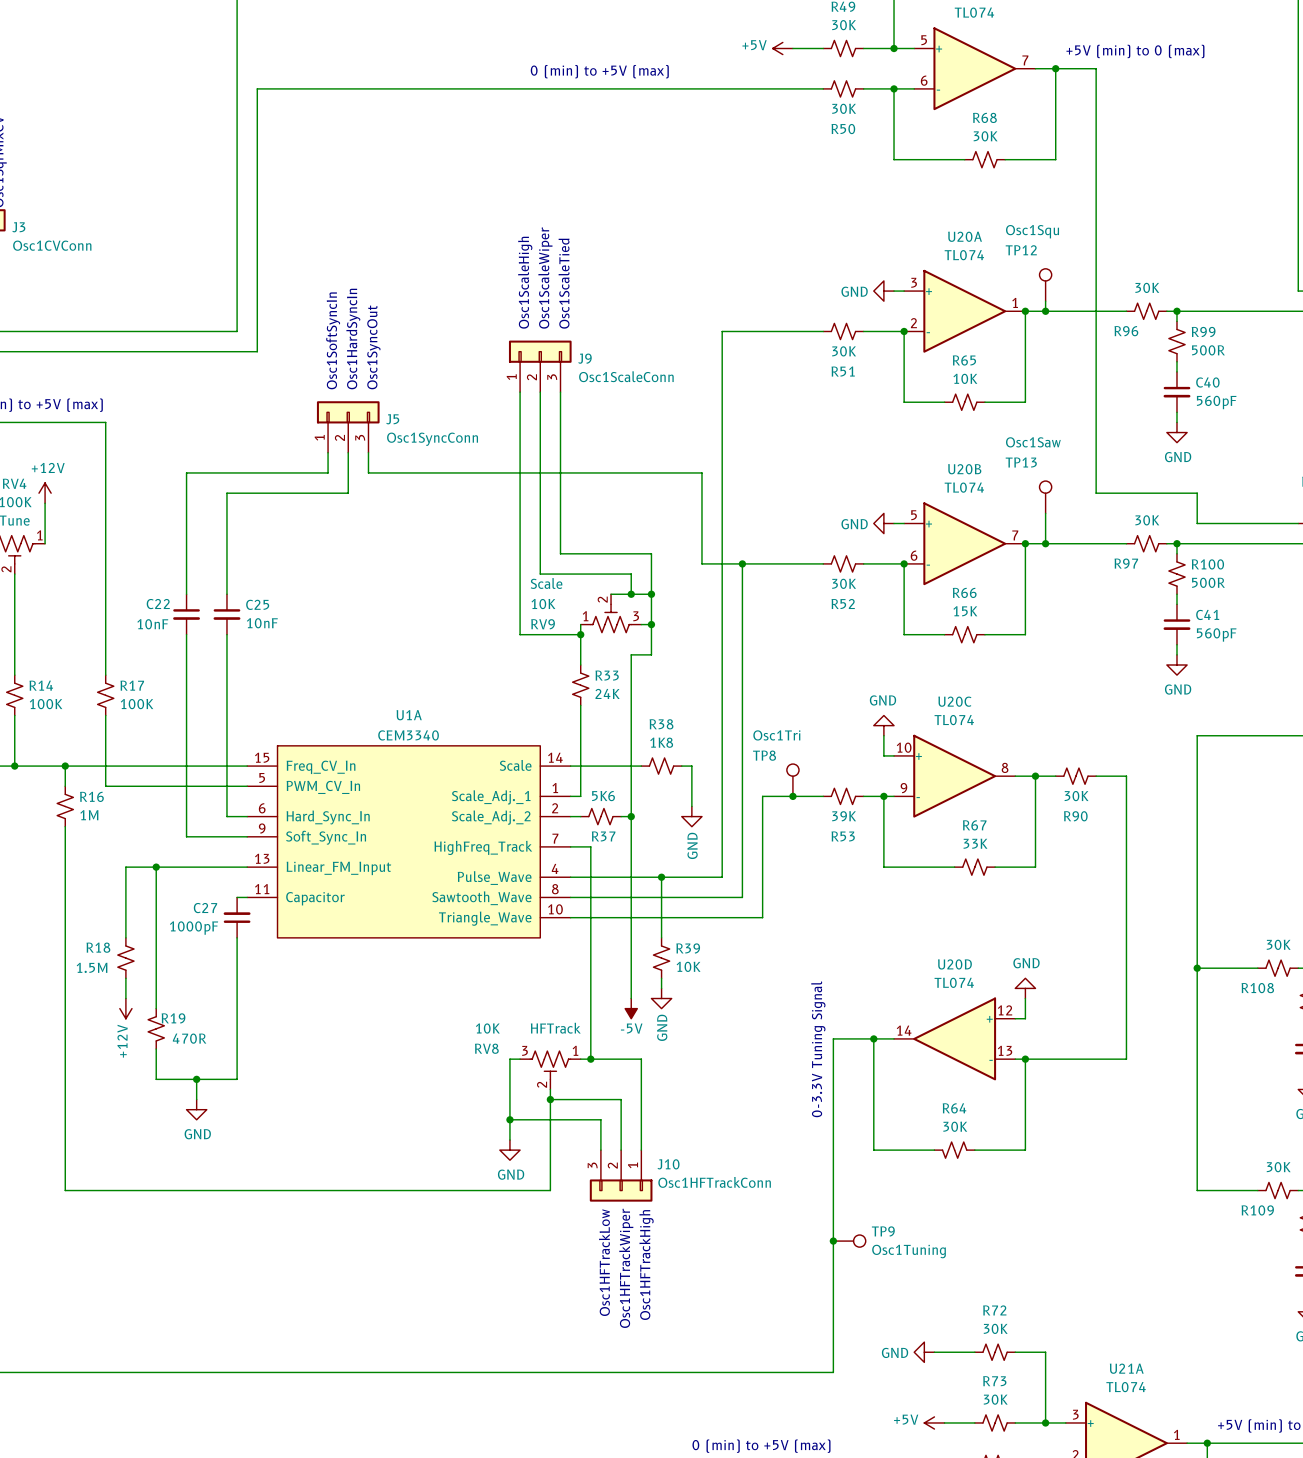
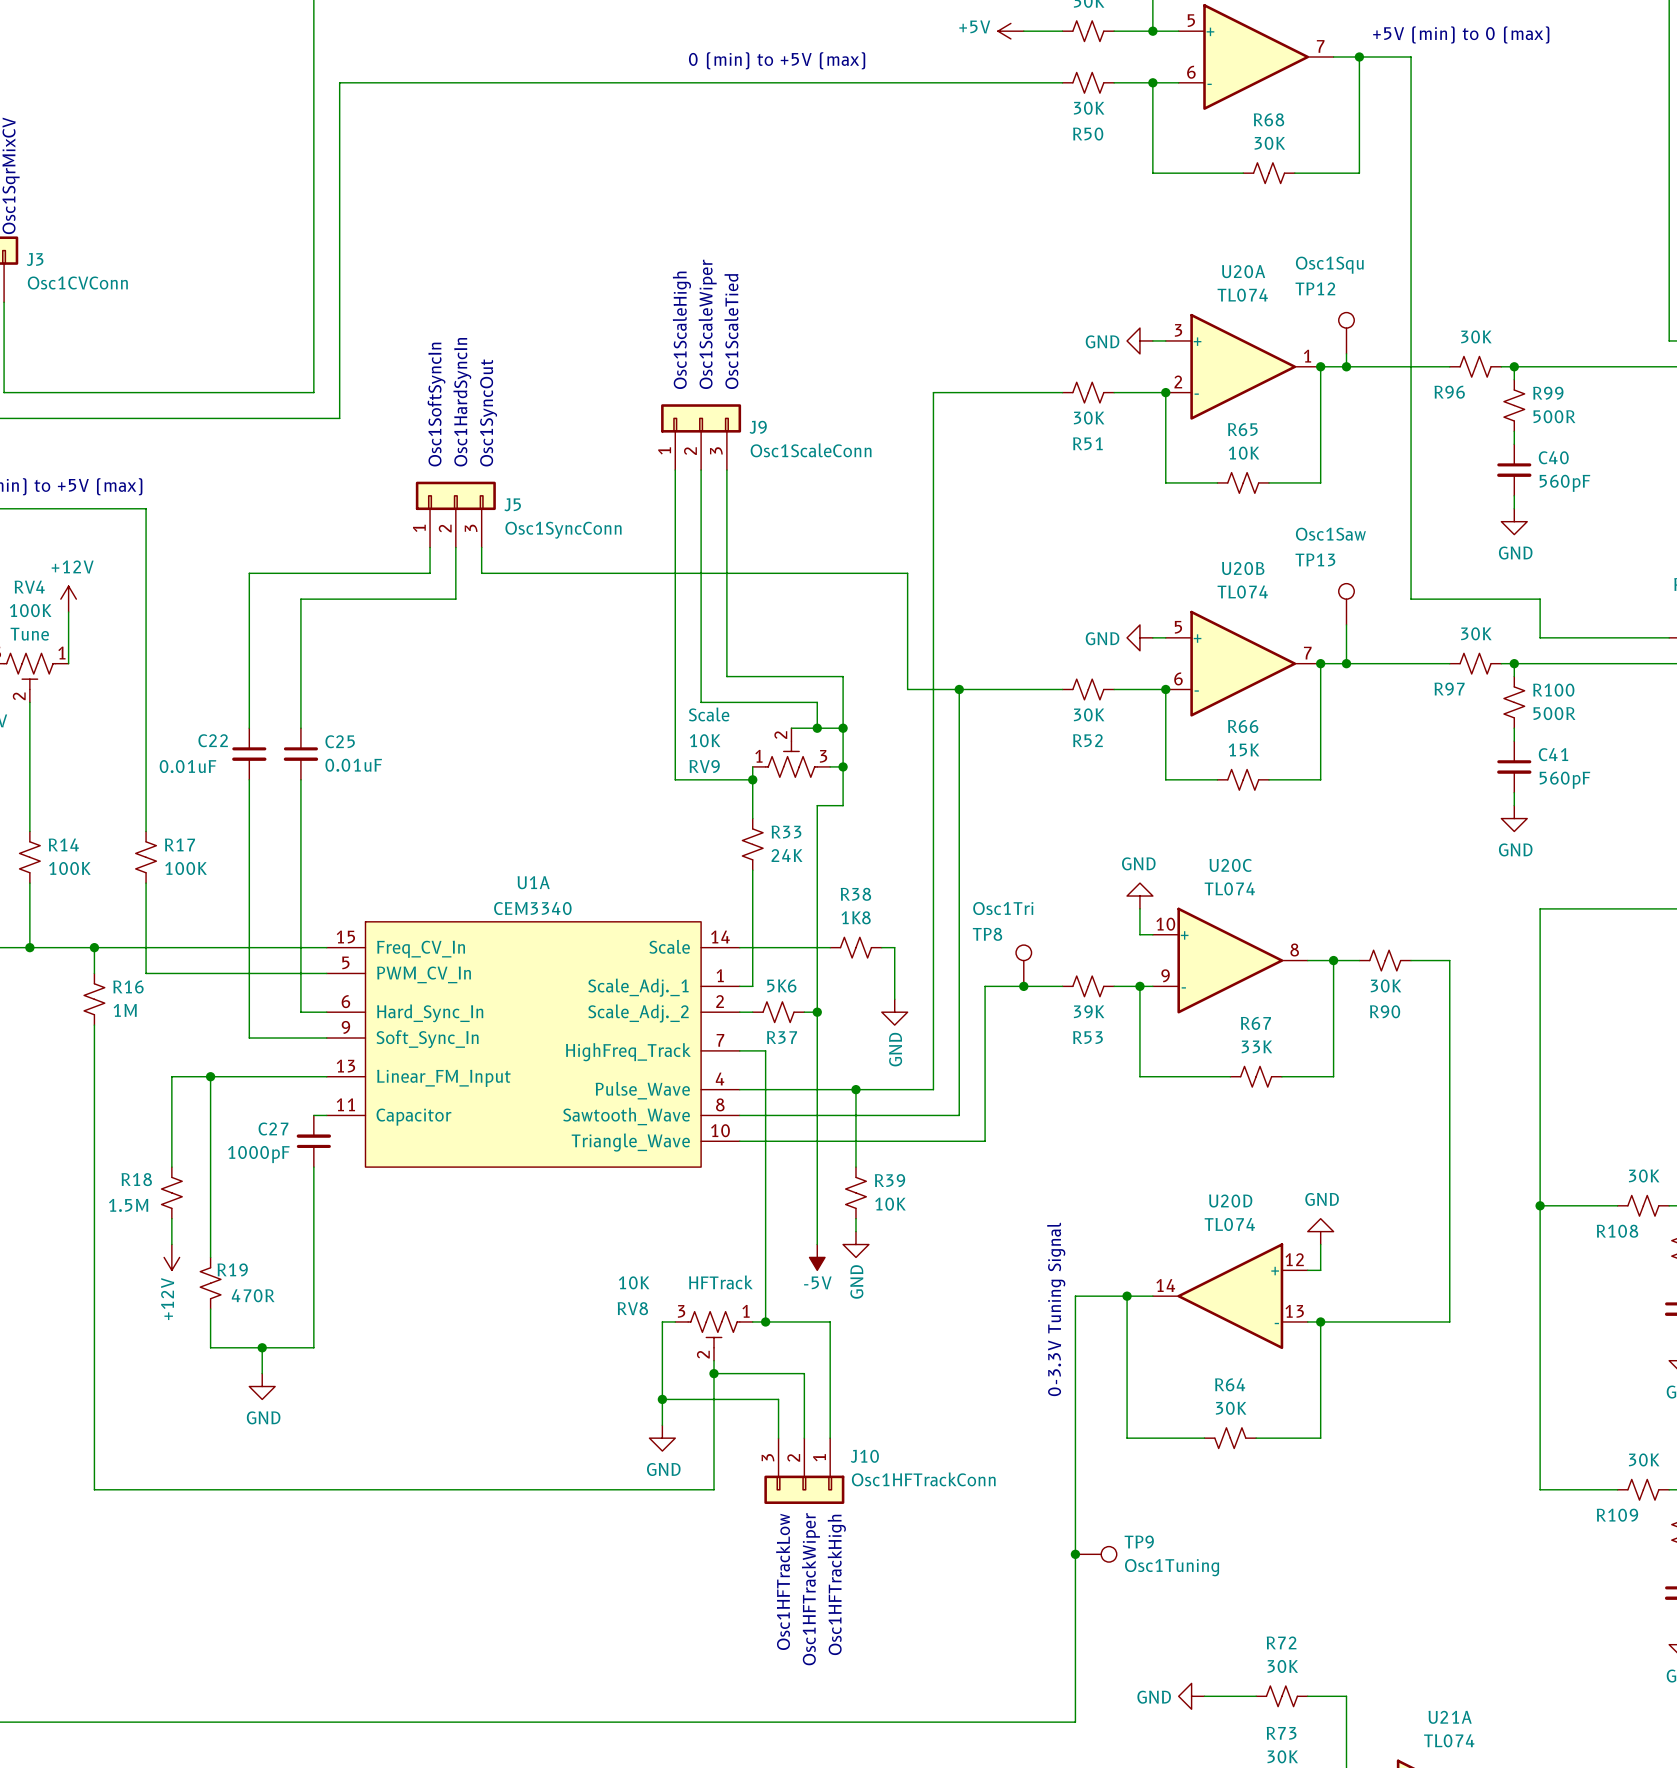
C25 value: 10nF (262, 623) -> 0.01uF (353, 765)
C22 value: 10nF (152, 624) -> 0.01uF (187, 766)

